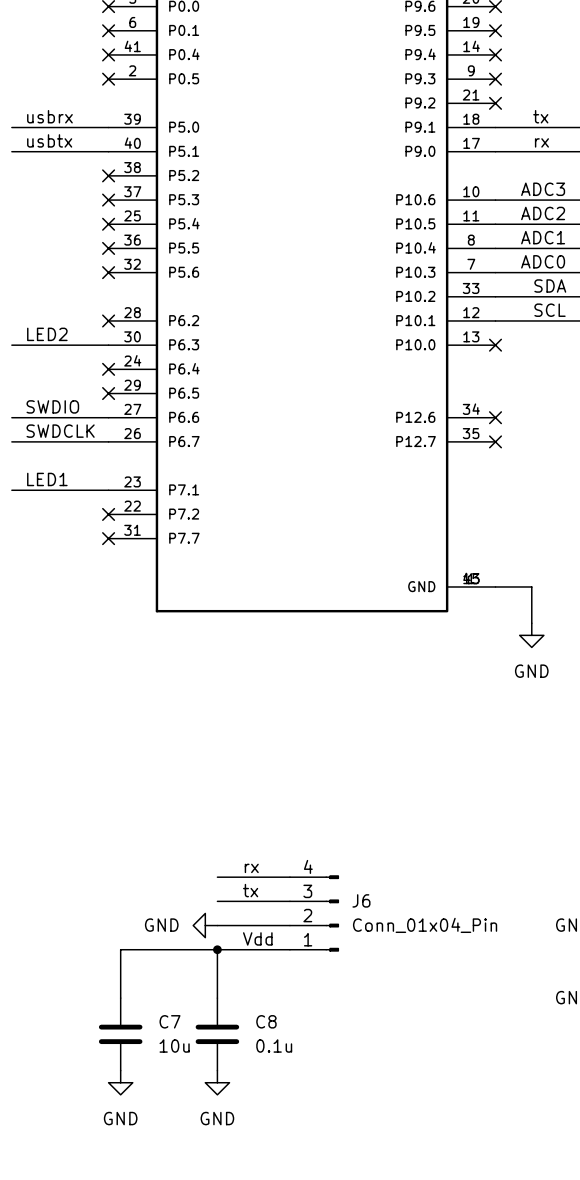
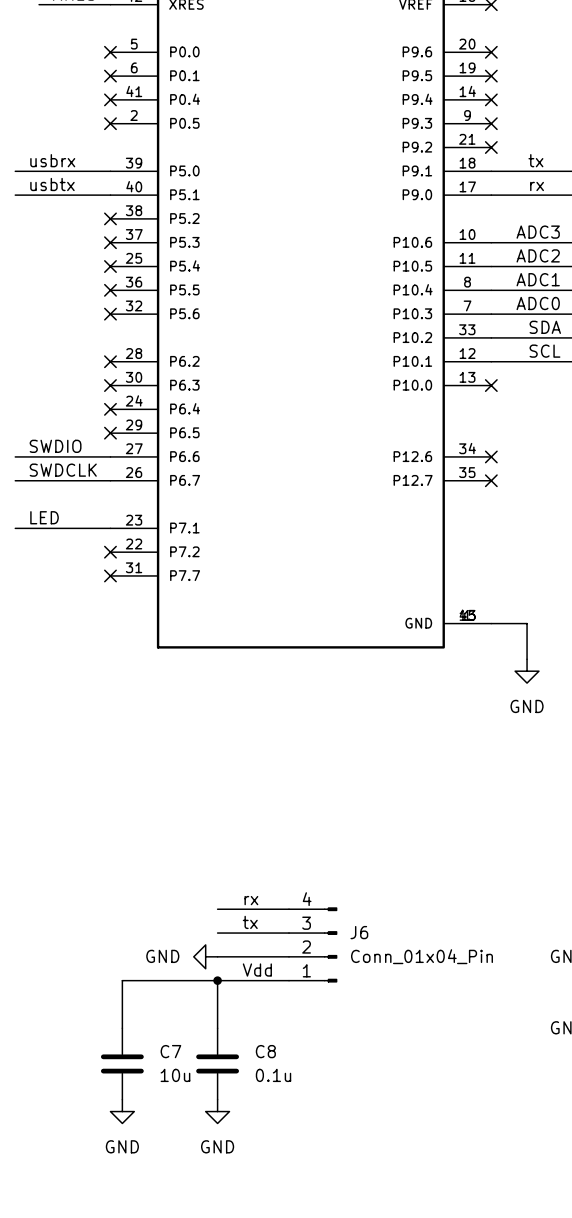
label: LED2 (47, 334) -> none
wire: (11, 345) (108, 345) -> none
no-connect mark: none -> (110, 385)
label: LED1 (47, 479) -> LED (44, 517)

